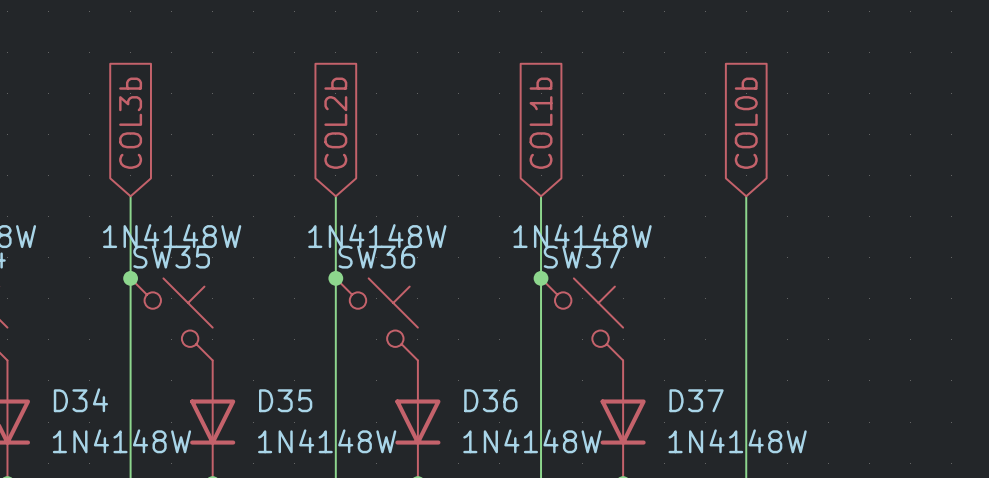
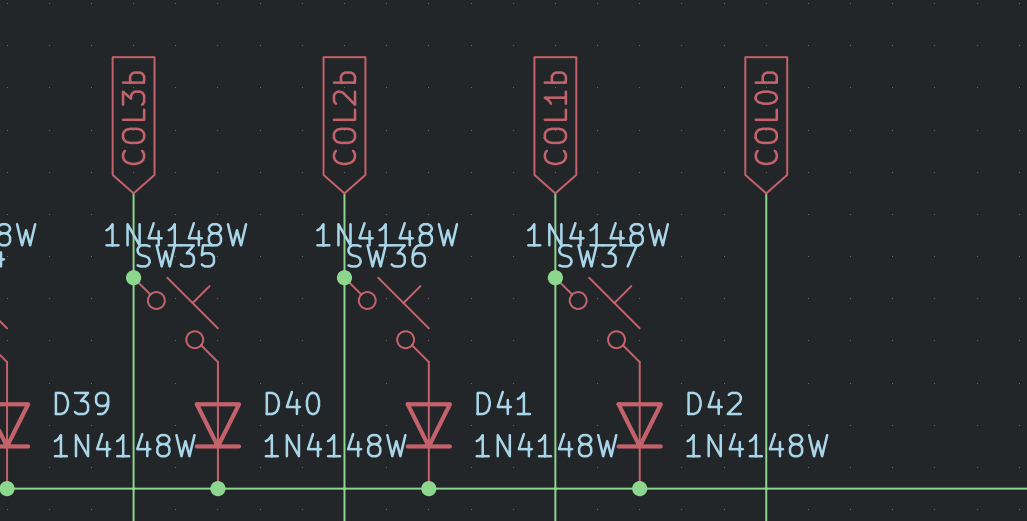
D34 name: D34 (80, 400) -> D39 (82, 403)
D35 name: D35 (285, 400) -> D40 (292, 402)
D36 name: D36 (490, 400) -> D41 (503, 402)
D37 name: D37 (696, 400) -> D42 (714, 402)

